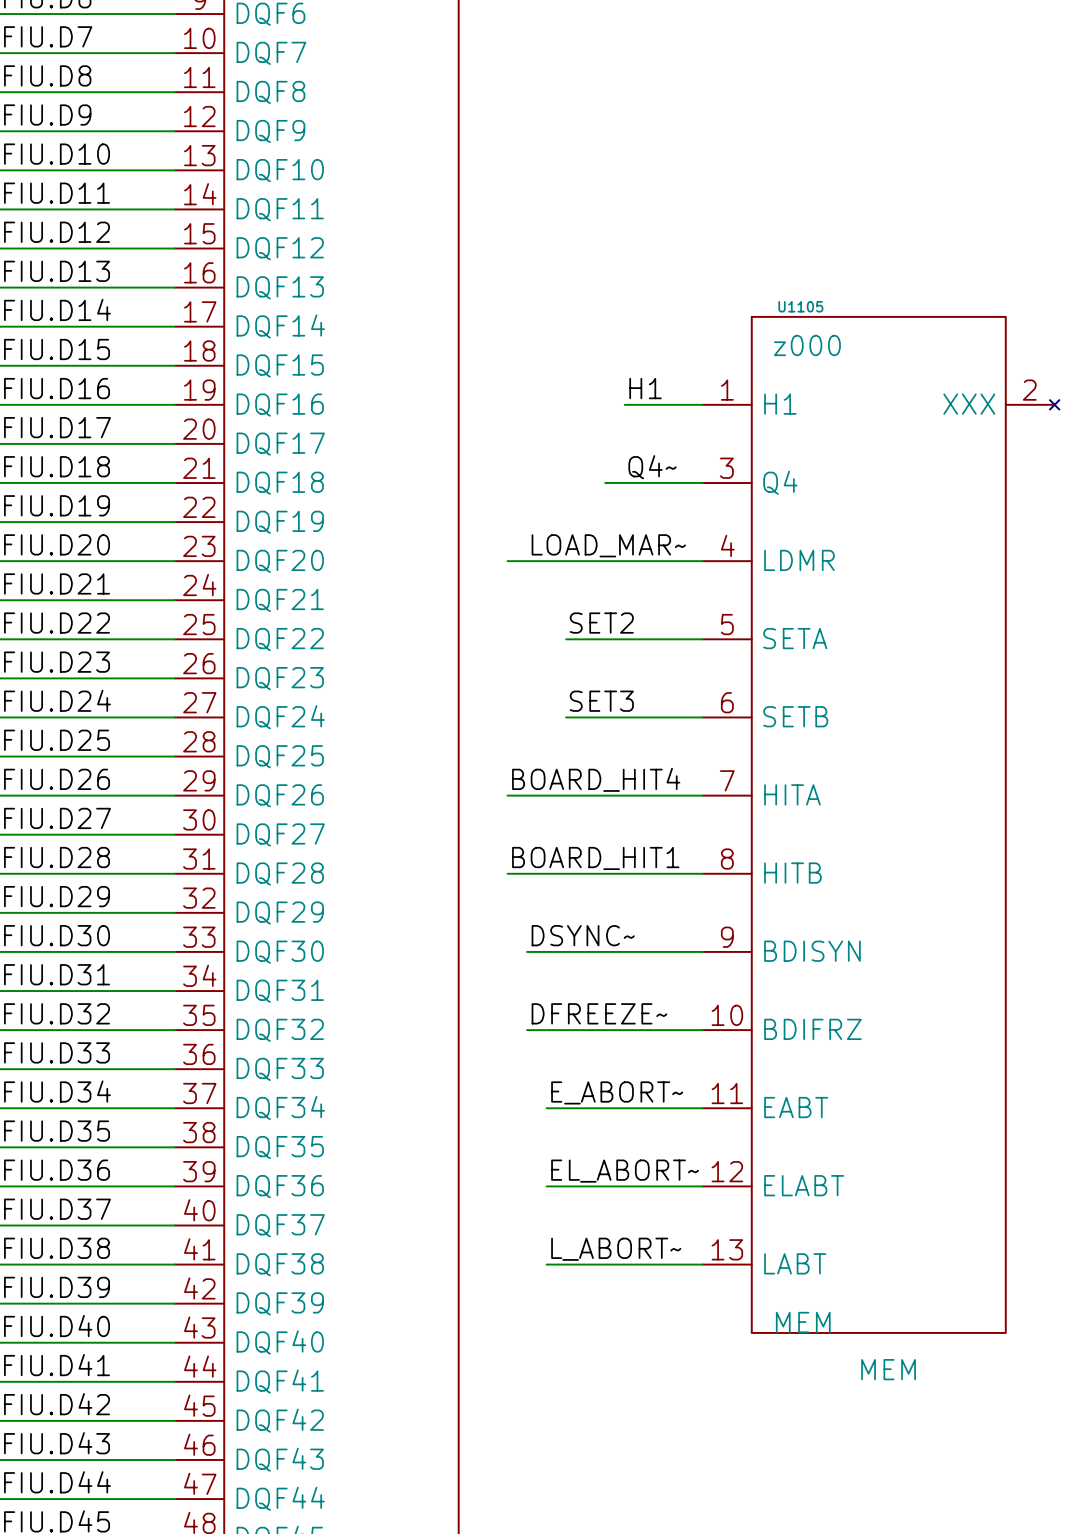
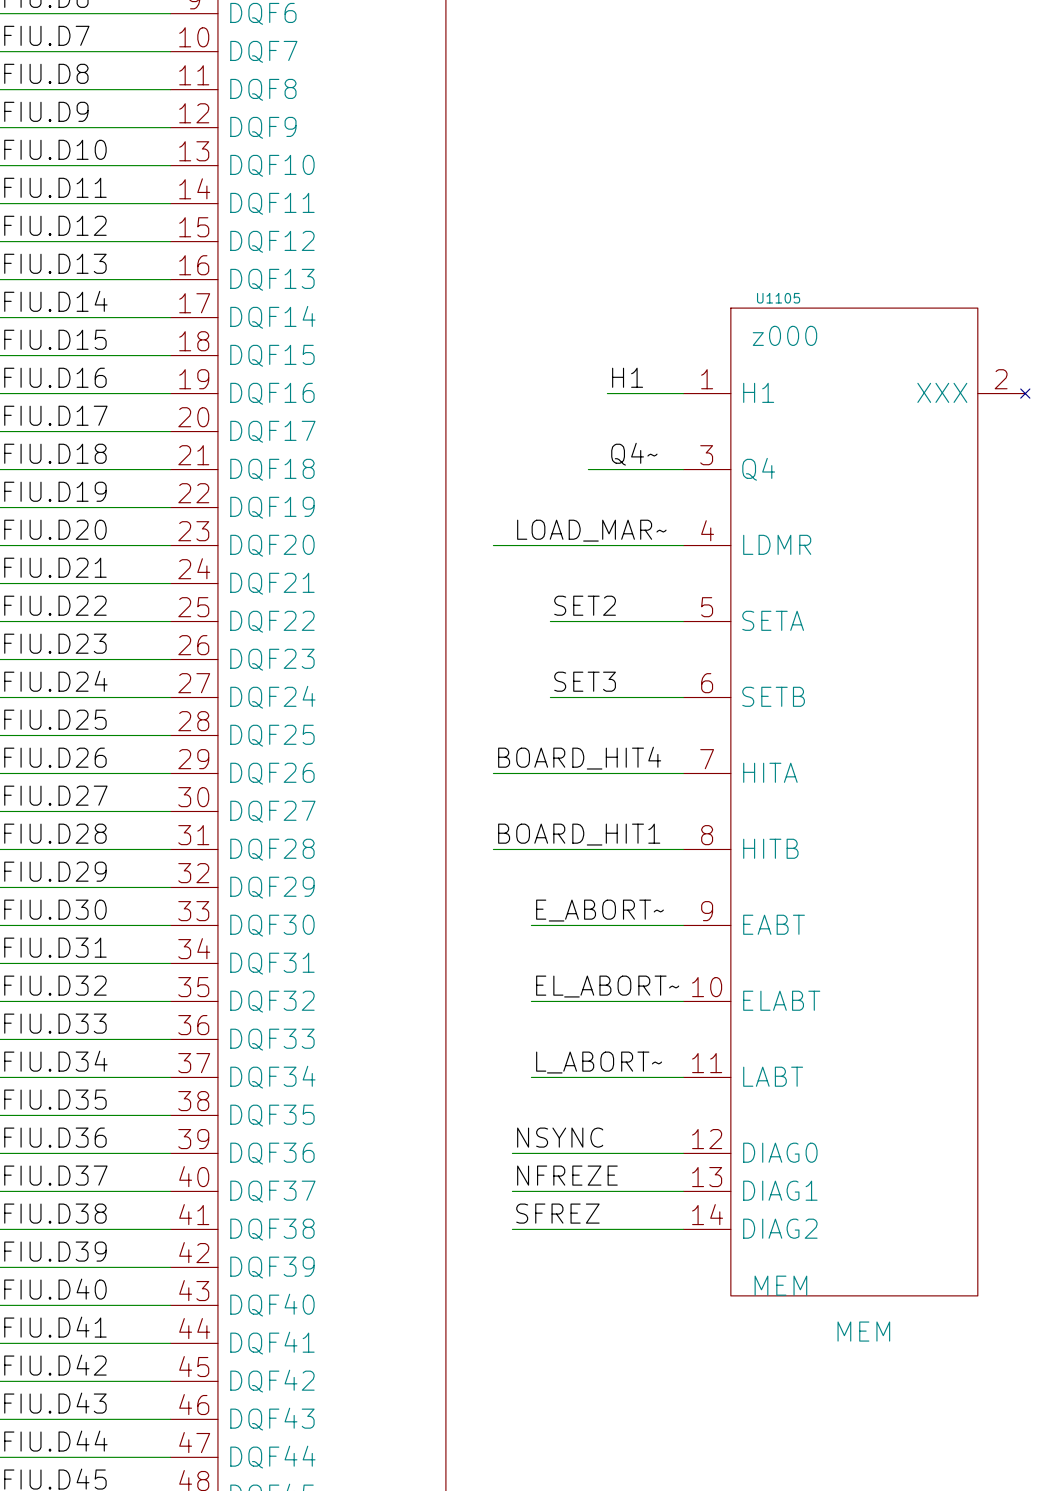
U1105 symbol: [702, 316, 1055, 1333] -> [683, 308, 1026, 1296]
label: DSYNC~ (583, 935) -> none
label: none -> E_ABORT~ (600, 910)
wire: (527, 951) (546, 951) -> none
label: DFREEZE~ (599, 1013) -> none
wire: (527, 1030) (546, 1030) -> (512, 1153) (531, 1153)
label: E_ABORT~ (617, 1092) -> L_ABORT~ (599, 1062)
label: none -> NSYNC (560, 1137)
label position: EL_ABORT~ (625, 1171) -> EL_ABORT~ (607, 986)
label: none -> NFREZE (567, 1175)
wire: none -> (512, 1191) (683, 1191)
label: none -> SFREZ (557, 1213)
label: L_ABORT~ (616, 1249) -> none
wire: none -> (512, 1229) (531, 1229)

